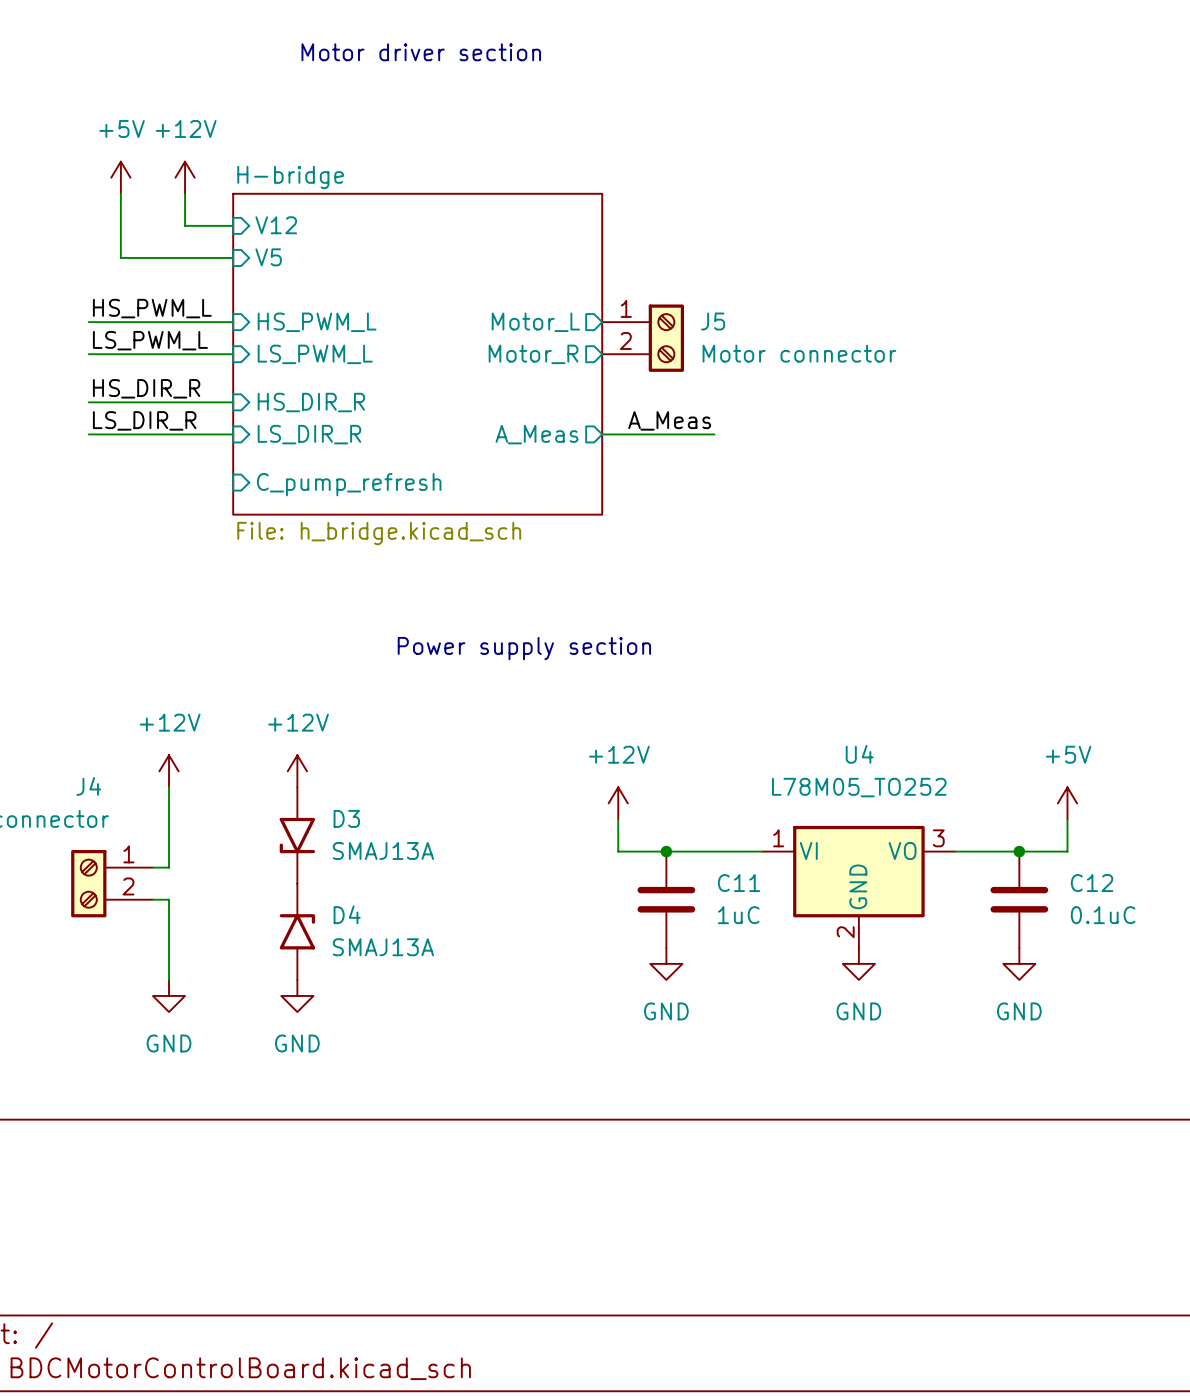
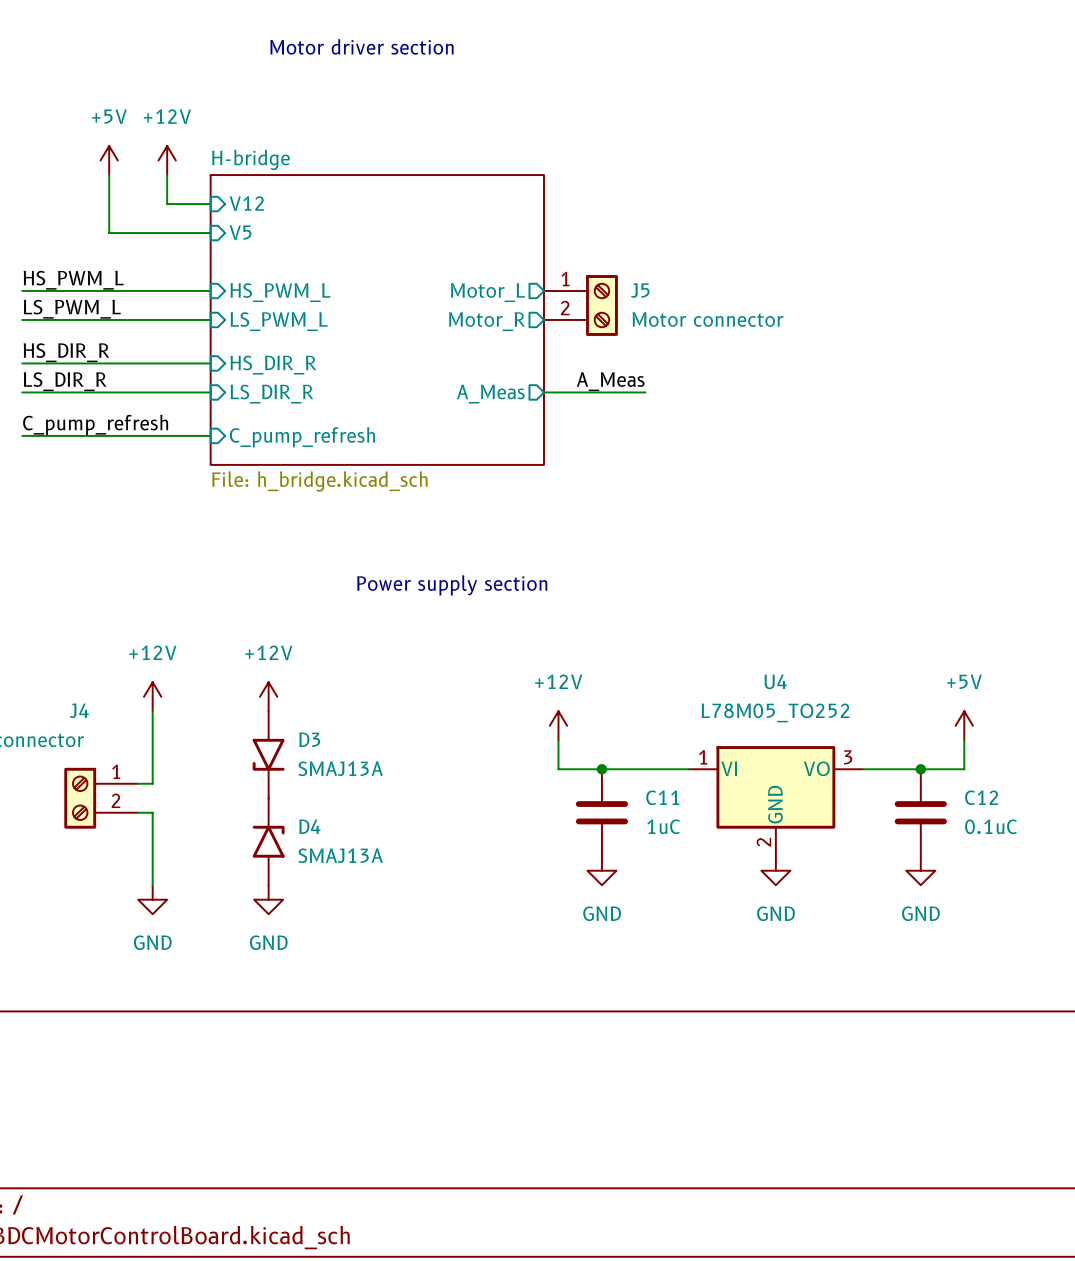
label position: HS_PWM_L (152, 308) -> HS_PWM_L (73, 280)
wire: none -> (22, 290) (80, 290)
label position: LS_PWM_L (150, 340) -> LS_PWM_L (72, 309)
wire: none -> (22, 319) (80, 319)
label position: HS_DIR_R (146, 388) -> HS_DIR_R (66, 352)
wire: none -> (22, 363) (80, 363)
label position: LS_DIR_R (144, 420) -> LS_DIR_R (65, 381)
wire: none -> (22, 392) (80, 392)
label: none -> C_pump_refresh (95, 424)
wire: none -> (22, 435) (210, 435)

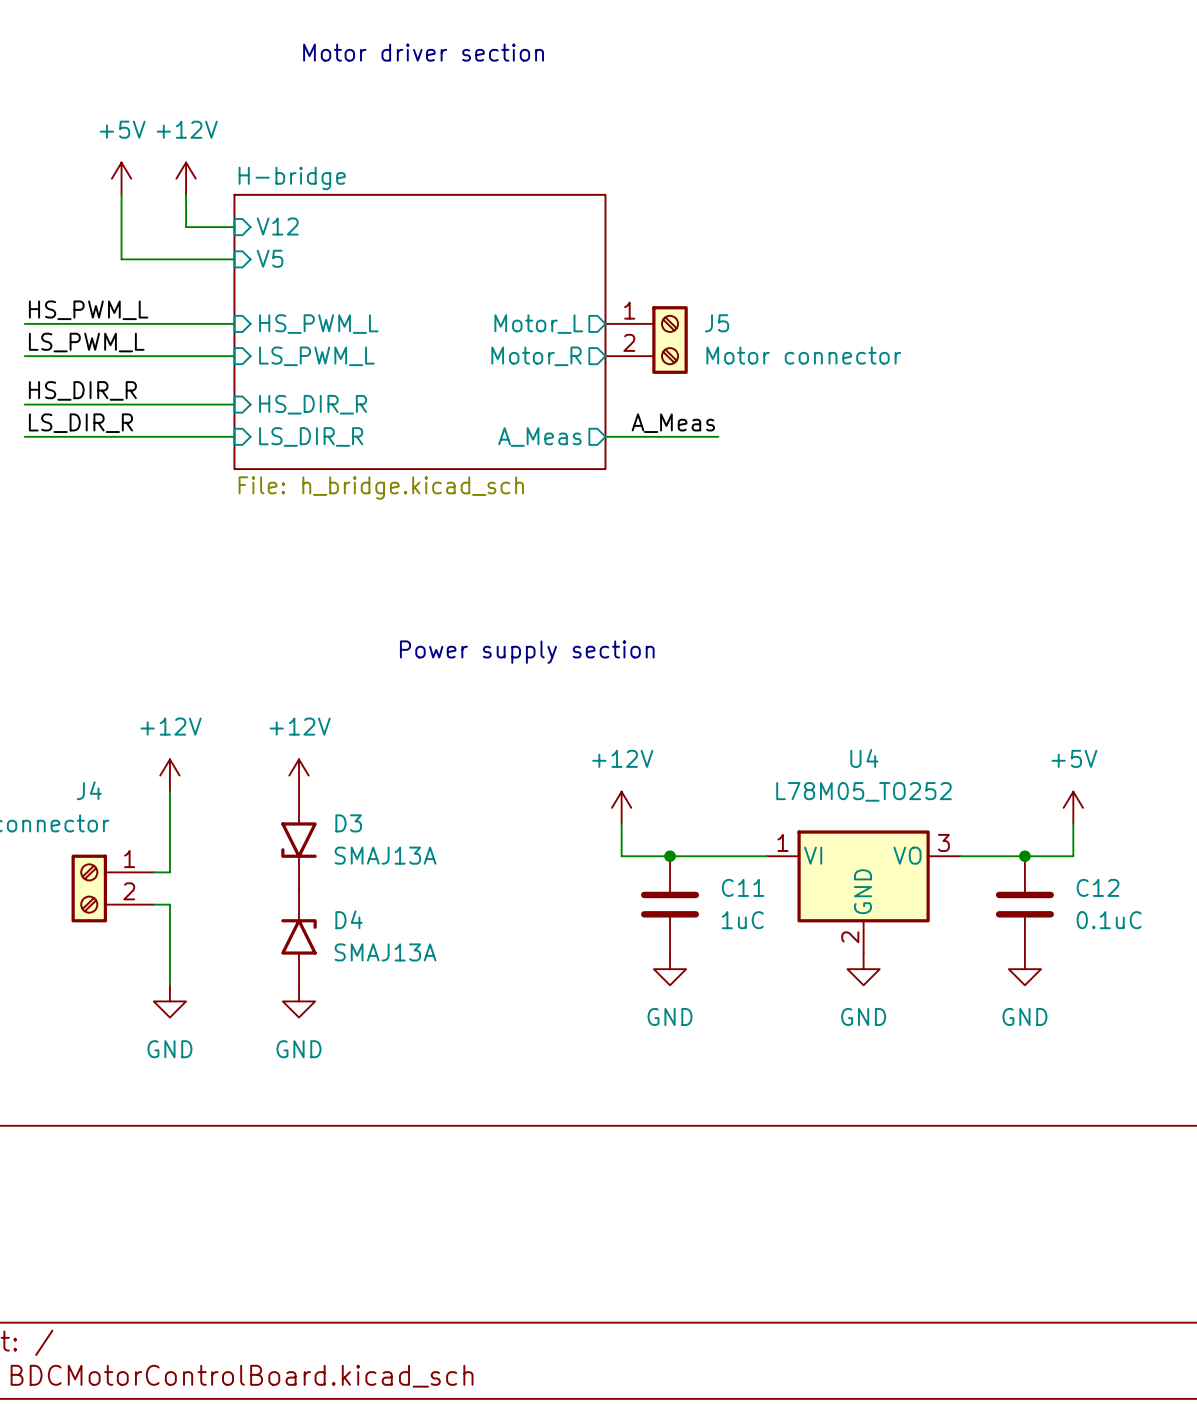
sheet H-bridge: none -> File: h_bridge.kicad_sch (419, 331)
sheet H-bridge: File: h_bridge.kicad_sch (377, 319) -> none
label: C_pump_refresh (95, 424) -> none
wire: (22, 435) (210, 435) -> none
sheet pin: C_pump_refresh (302, 437) -> none

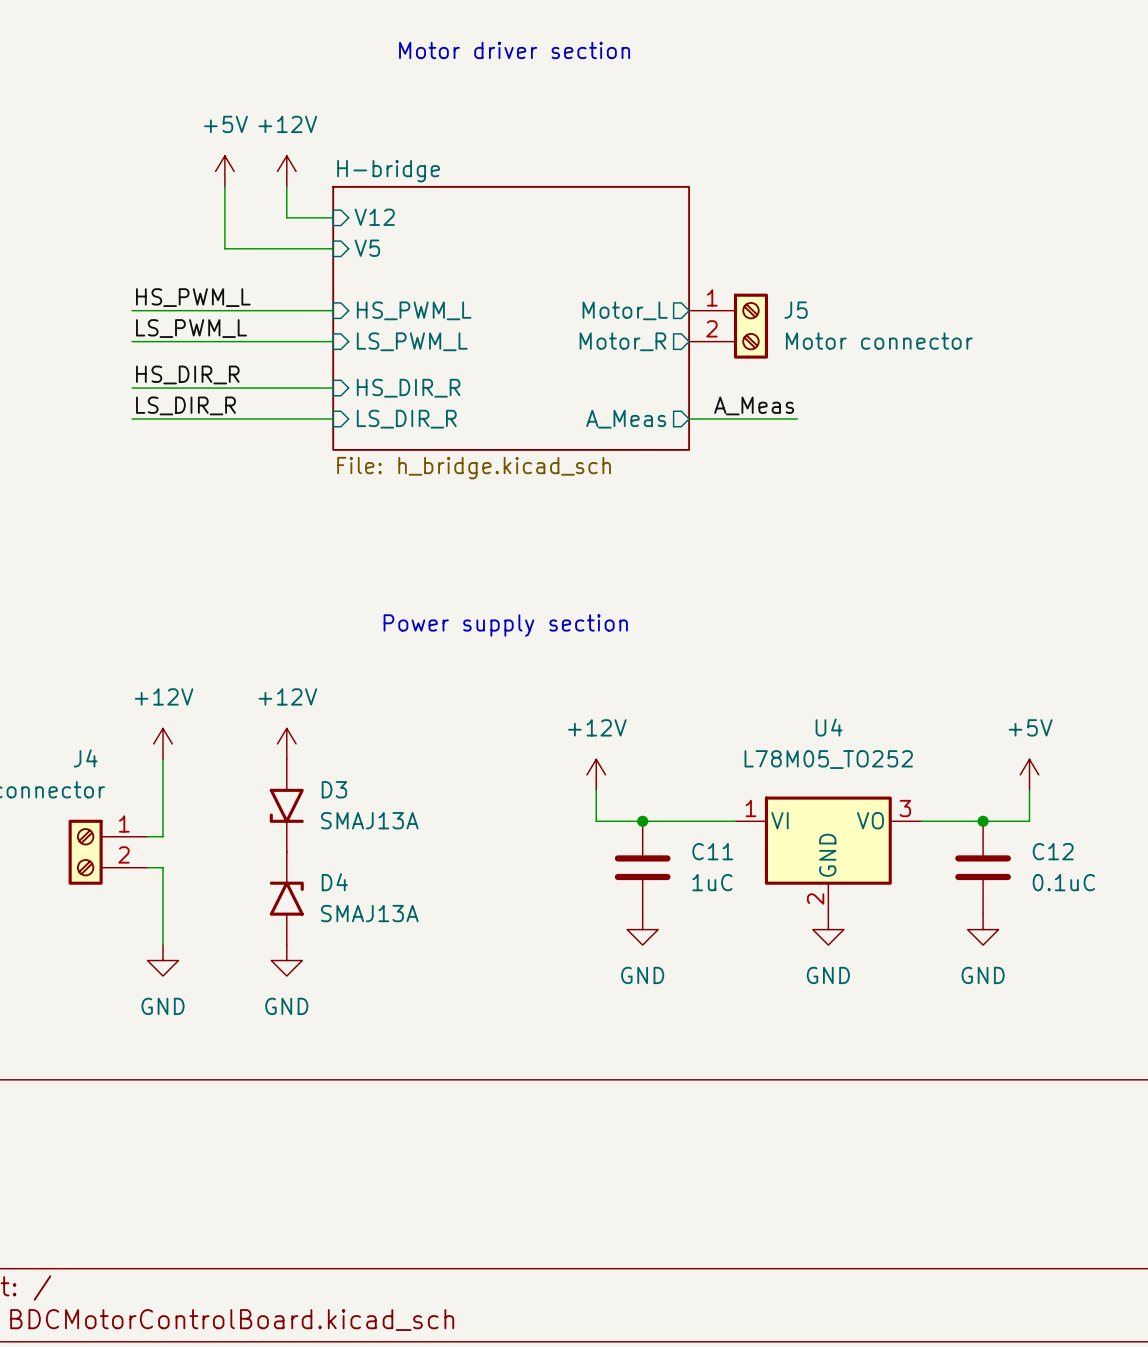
text position: Motor driver section (423, 52) -> Motor driver section (514, 50)
power symbol position: +5V (121, 178) -> +5V (224, 171)
power symbol position: +12V (186, 178) -> +12V (286, 171)
wire: (121, 194) (121, 259) (234, 259) -> (224, 186) (224, 248) (333, 248)
wire: (186, 194) (186, 227) (234, 227) -> (286, 186) (286, 217) (333, 217)
sheet pin position: V12 (277, 226) -> V12 (374, 217)
sheet pin position: V5 (270, 258) -> V5 (367, 248)
label position: HS_PWM_L (88, 310) -> HS_PWM_L (193, 297)
wire: (24, 323) (137, 323) -> (224, 310) (333, 310)
sheet pin position: HS_PWM_L (318, 324) -> HS_PWM_L (414, 310)
sheet pin position: Motor_L (538, 324) -> Motor_L (625, 310)
sheet H-bridge position: (419, 331) -> (511, 318)
J5 position: (646, 340) -> (728, 326)
label position: LS_PWM_L (86, 342) -> LS_PWM_L (191, 328)
wire: (24, 356) (137, 356) -> (224, 341) (333, 341)
sheet pin position: LS_PWM_L (316, 356) -> LS_PWM_L (412, 341)
sheet pin position: Motor_R (536, 356) -> Motor_R (622, 341)
label position: HS_DIR_R (82, 390) -> HS_DIR_R (187, 374)
wire: (24, 404) (137, 404) -> (224, 388) (333, 388)
sheet pin position: HS_DIR_R (313, 404) -> HS_DIR_R (408, 388)
label position: LS_DIR_R (80, 423) -> LS_DIR_R (185, 405)
label position: A_Meas (673, 423) -> A_Meas (754, 405)
wire: (24, 436) (137, 436) -> (224, 418) (333, 418)
sheet pin position: LS_DIR_R (311, 436) -> LS_DIR_R (406, 419)
sheet pin position: A_Meas (539, 436) -> A_Meas (626, 419)
wire: (605, 436) (718, 436) -> (797, 418) (689, 418)

